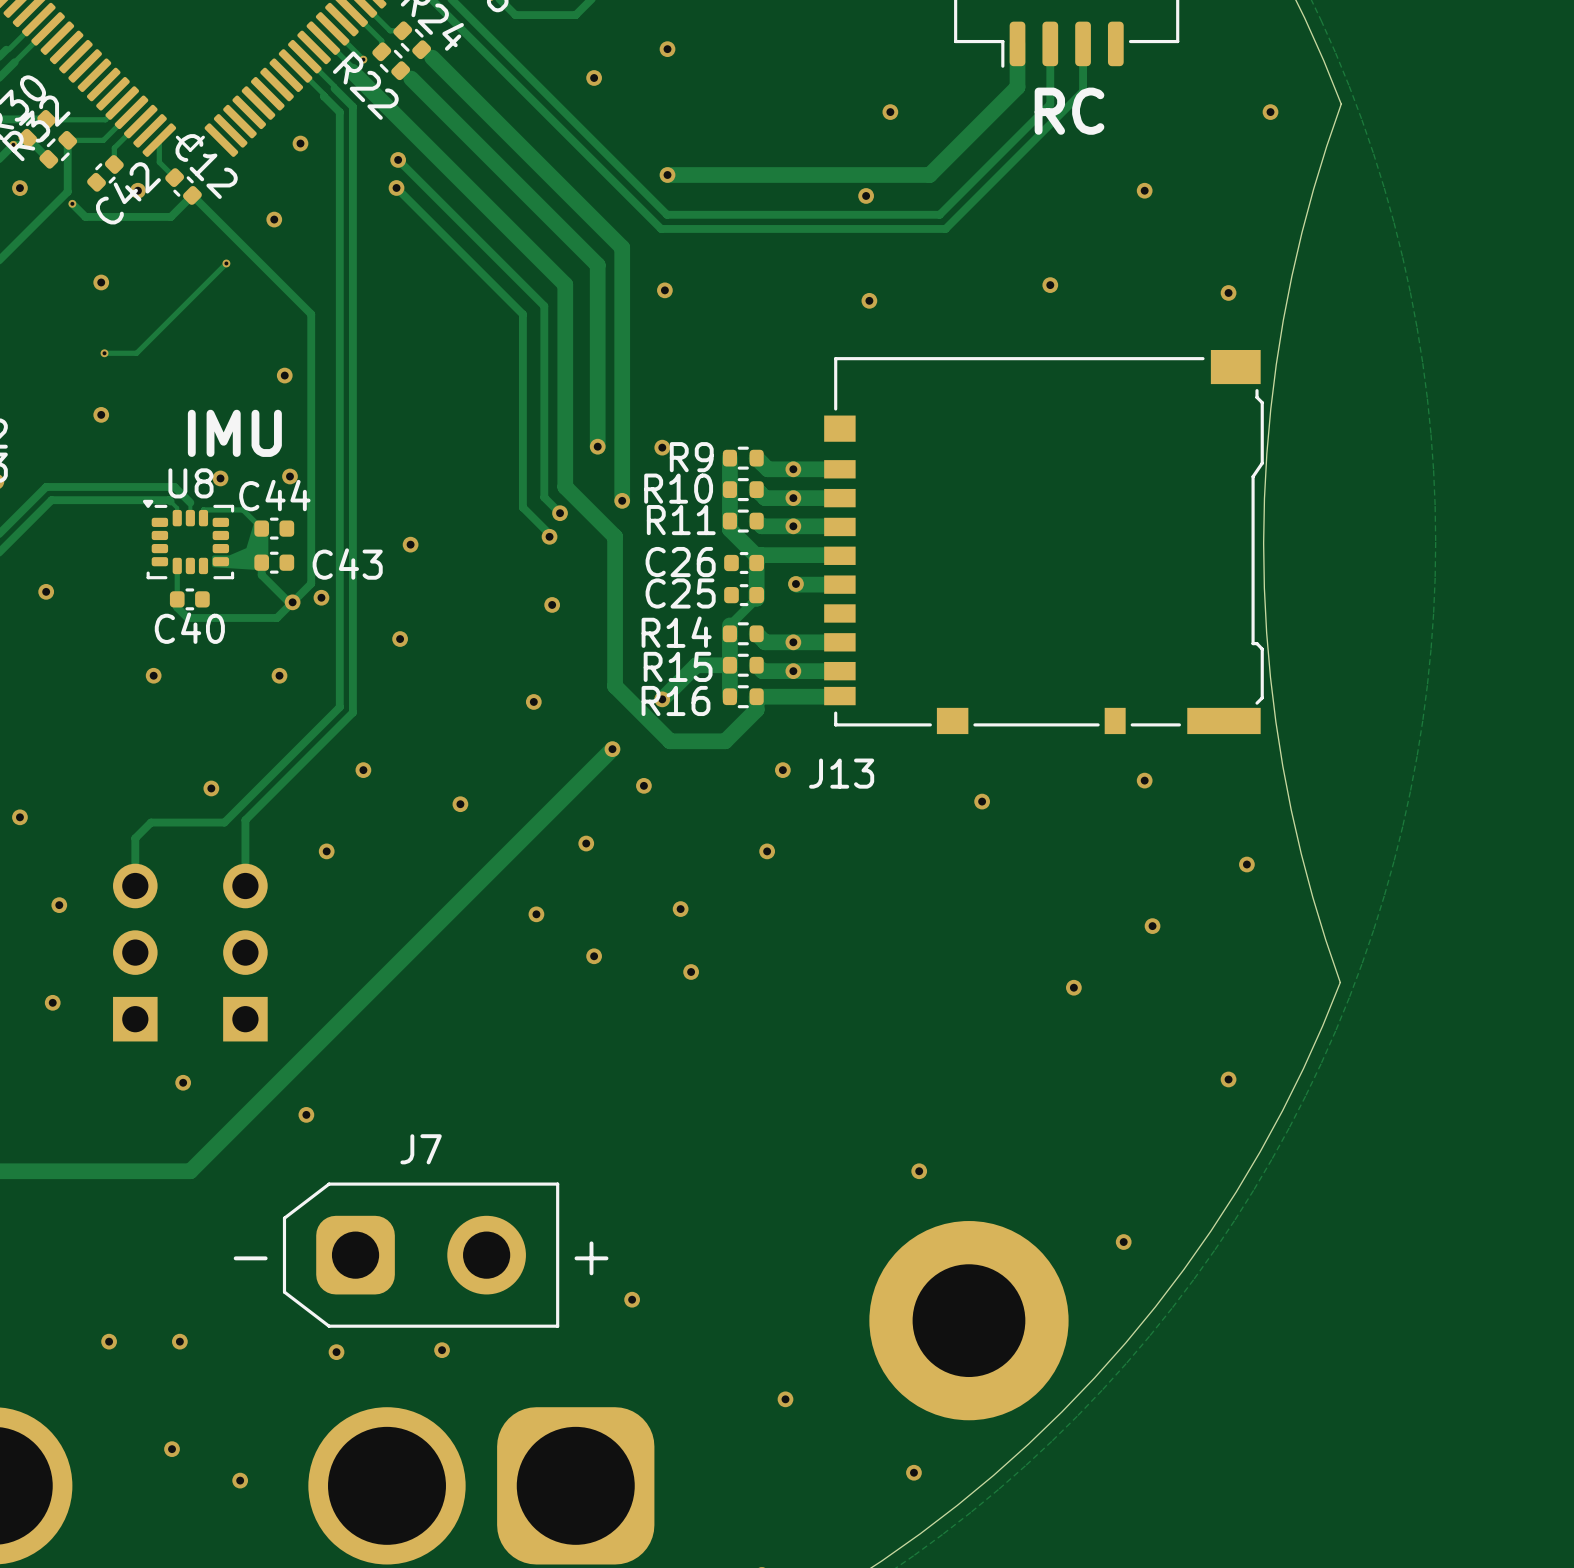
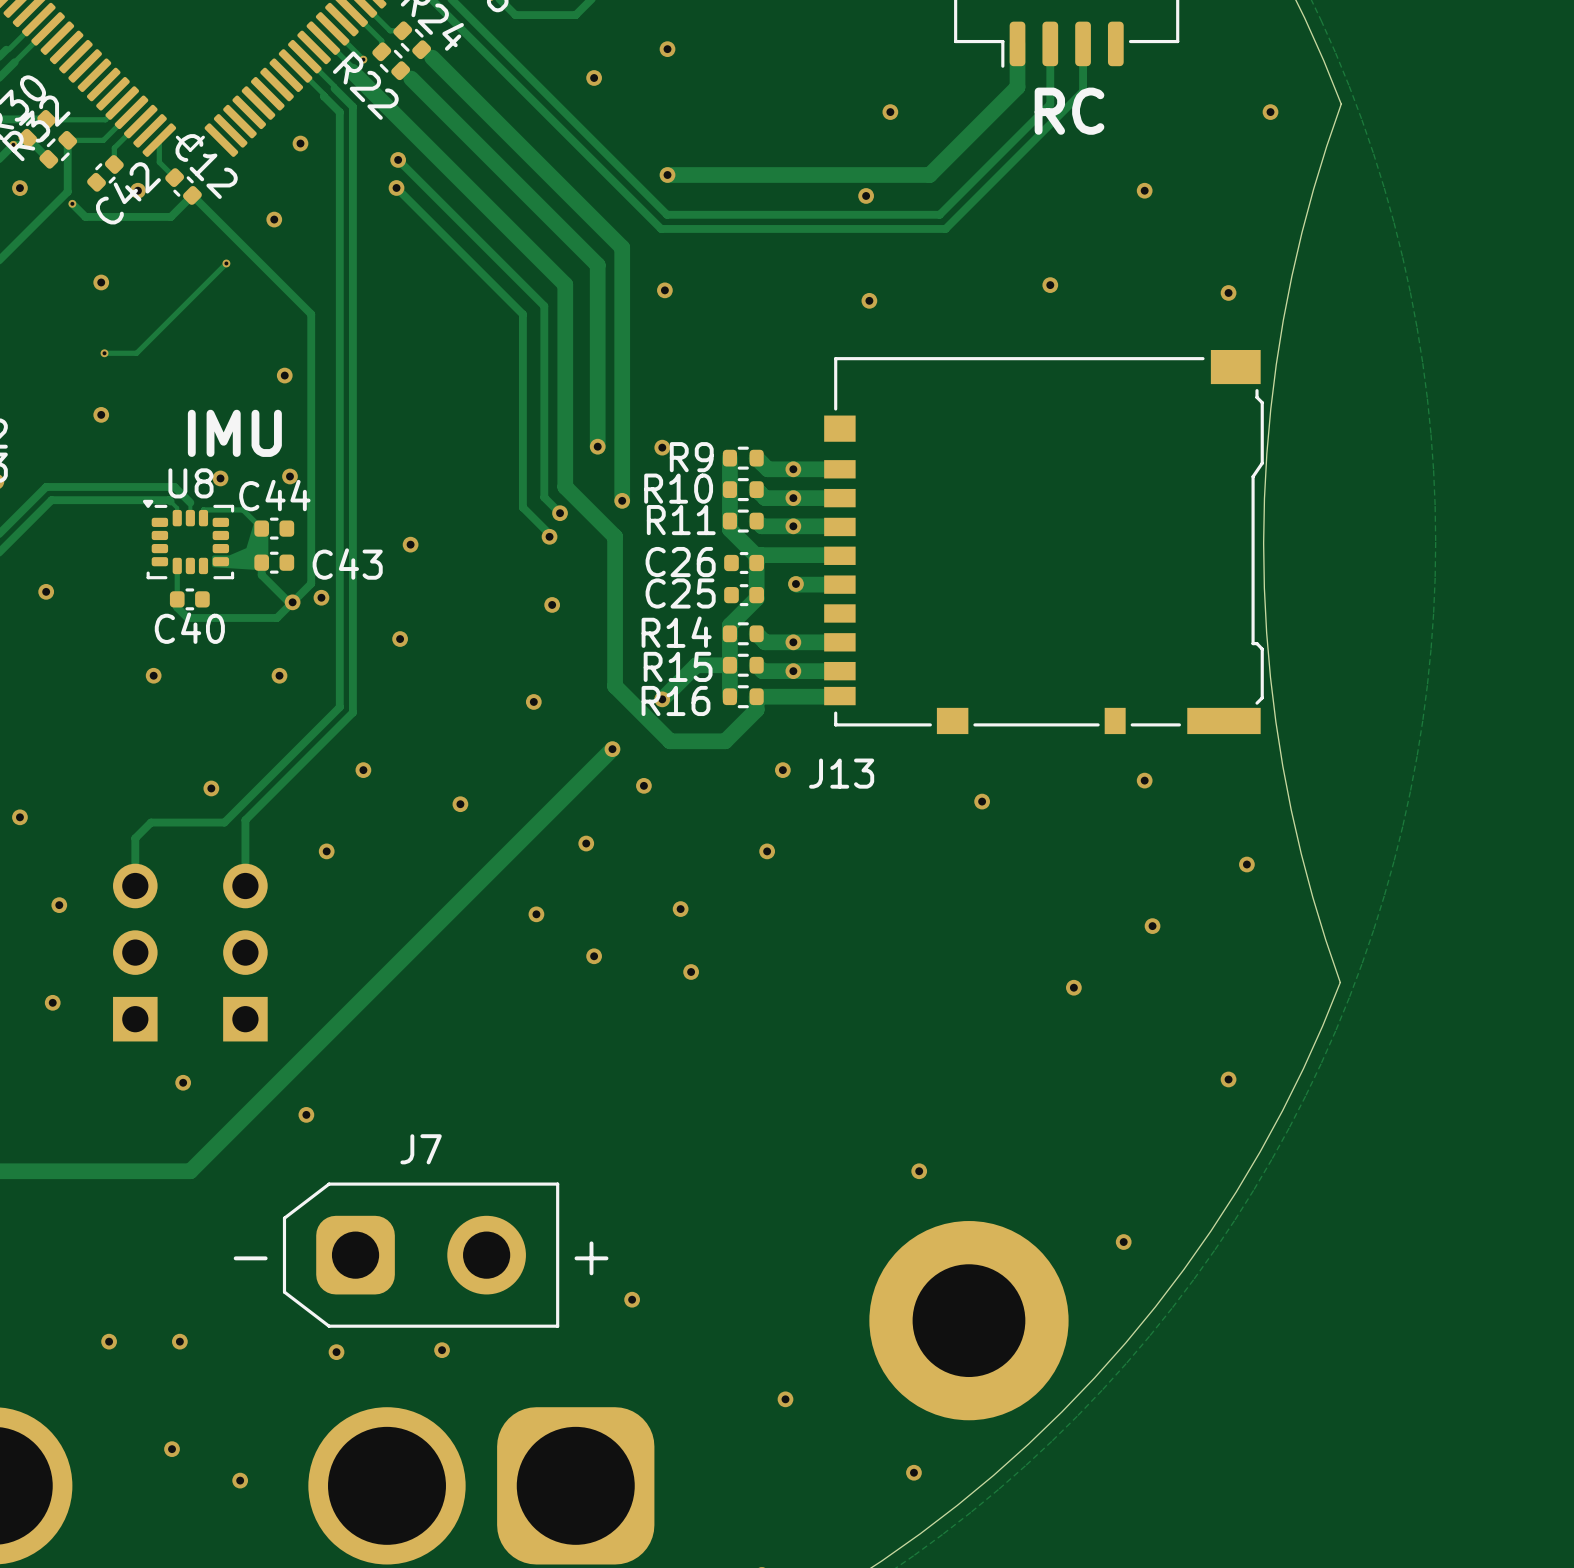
track width: thin (756, 598) (729, 625) -> thick (756, 598) (729, 625)

